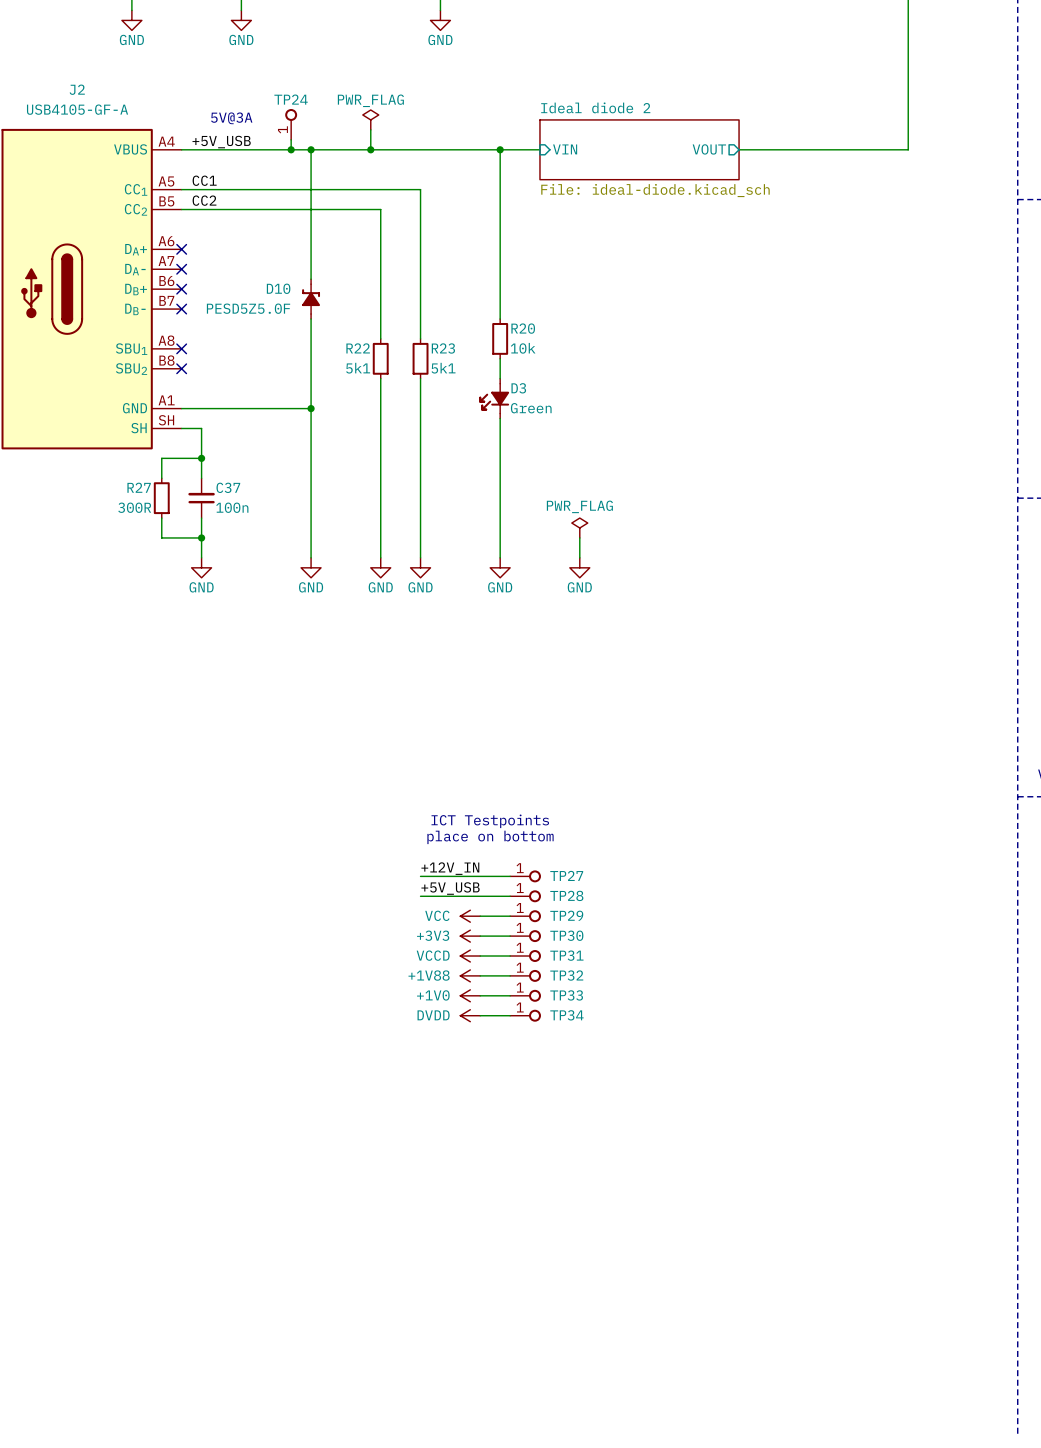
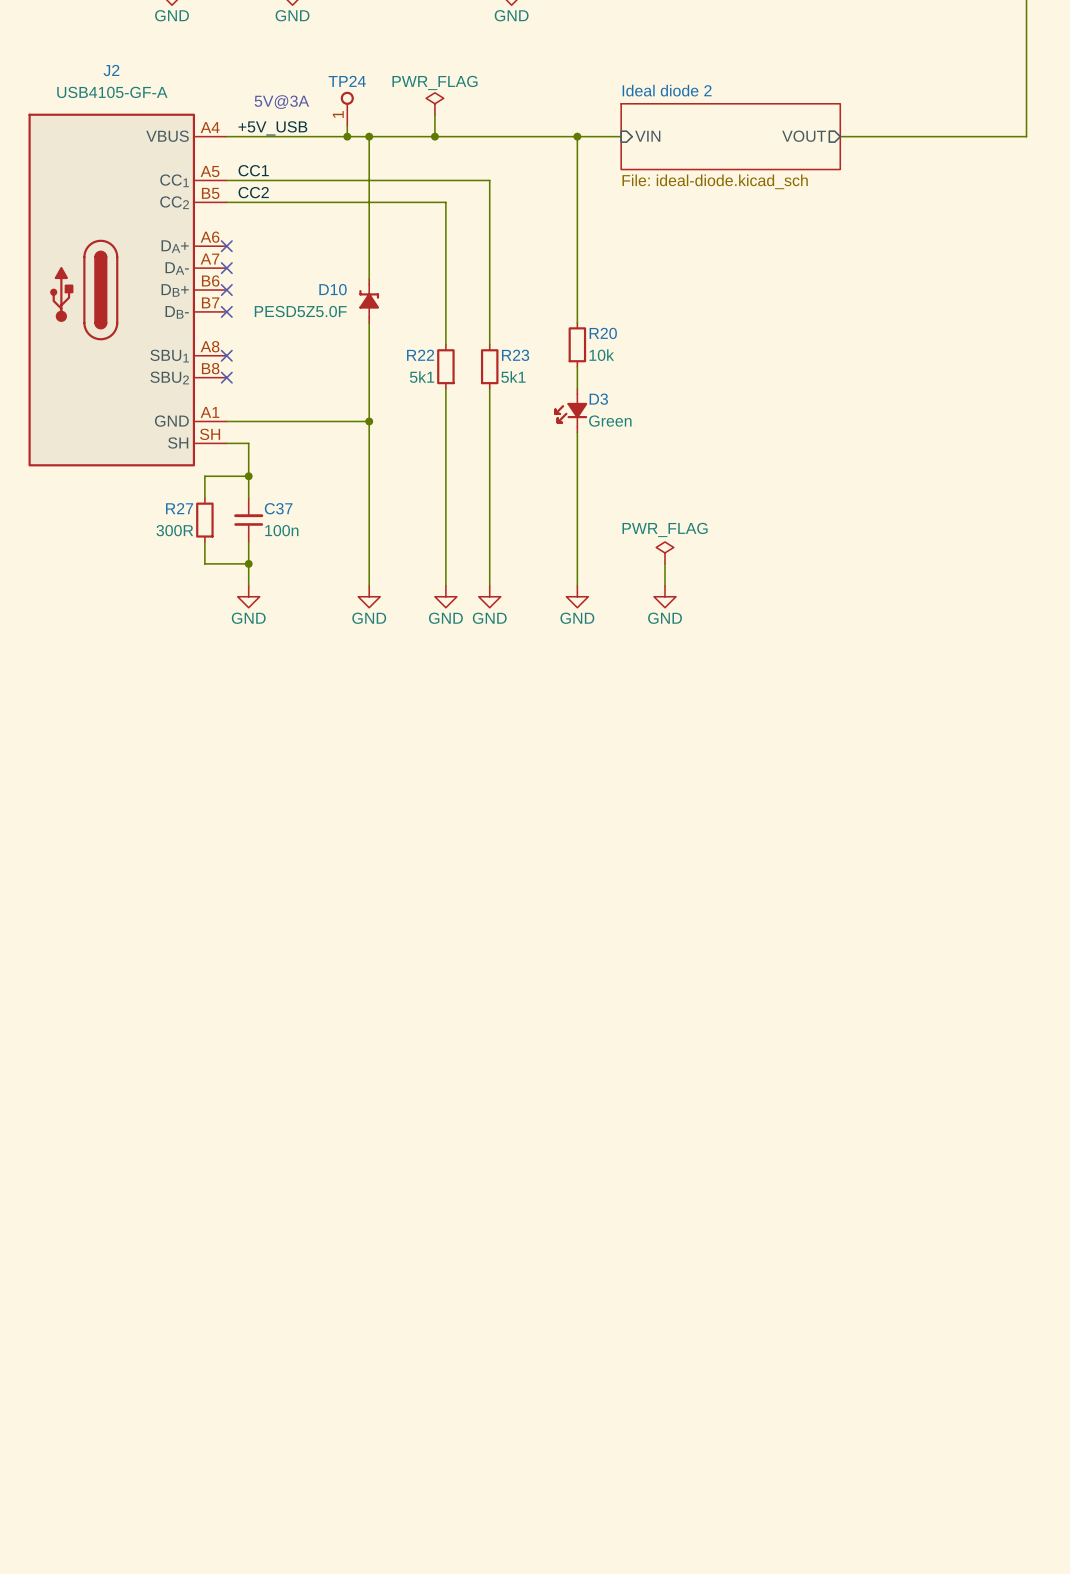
text: ICT Testpoints (490, 821) -> none
text: place on bottom (490, 837) -> none
label: +12V_IN (450, 868) -> none
wire: (420, 876) (510, 876) -> none
TP27: (525, 876) -> none
label: +5V_USB (450, 888) -> none
wire: (420, 896) (510, 896) -> none
TP28: (525, 896) -> none
power symbol: VCC (470, 916) -> none
wire: (480, 916) (510, 916) -> none
TP29: (525, 916) -> none
power symbol: +3V3 (470, 936) -> none
wire: (480, 936) (510, 936) -> none
TP30: (525, 936) -> none
power symbol: VCCD (470, 956) -> none
wire: (480, 956) (510, 956) -> none
TP31: (525, 956) -> none
power symbol: +1V88 (470, 975) -> none
wire: (480, 975) (510, 975) -> none
TP32: (525, 975) -> none
power symbol: +1V0 (470, 995) -> none
wire: (480, 995) (510, 995) -> none
TP33: (525, 995) -> none
power symbol: DVDD (470, 1015) -> none
wire: (480, 1015) (510, 1015) -> none
TP34: (525, 1015) -> none

